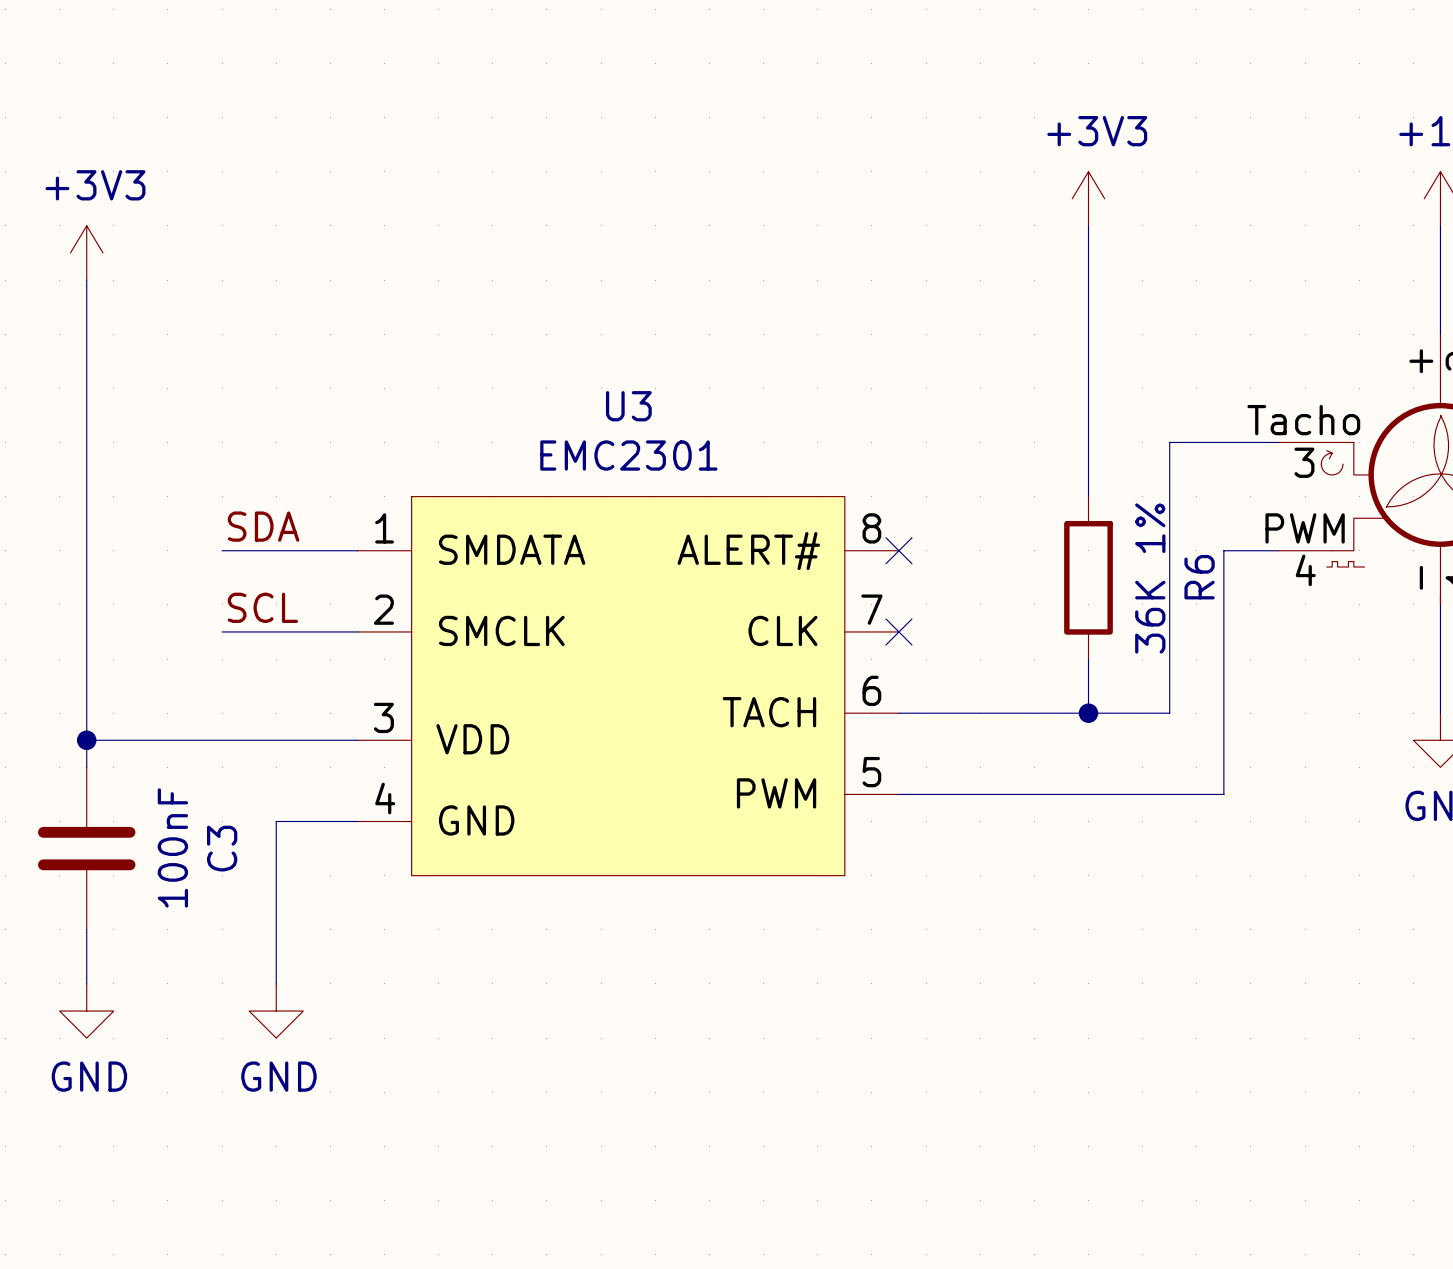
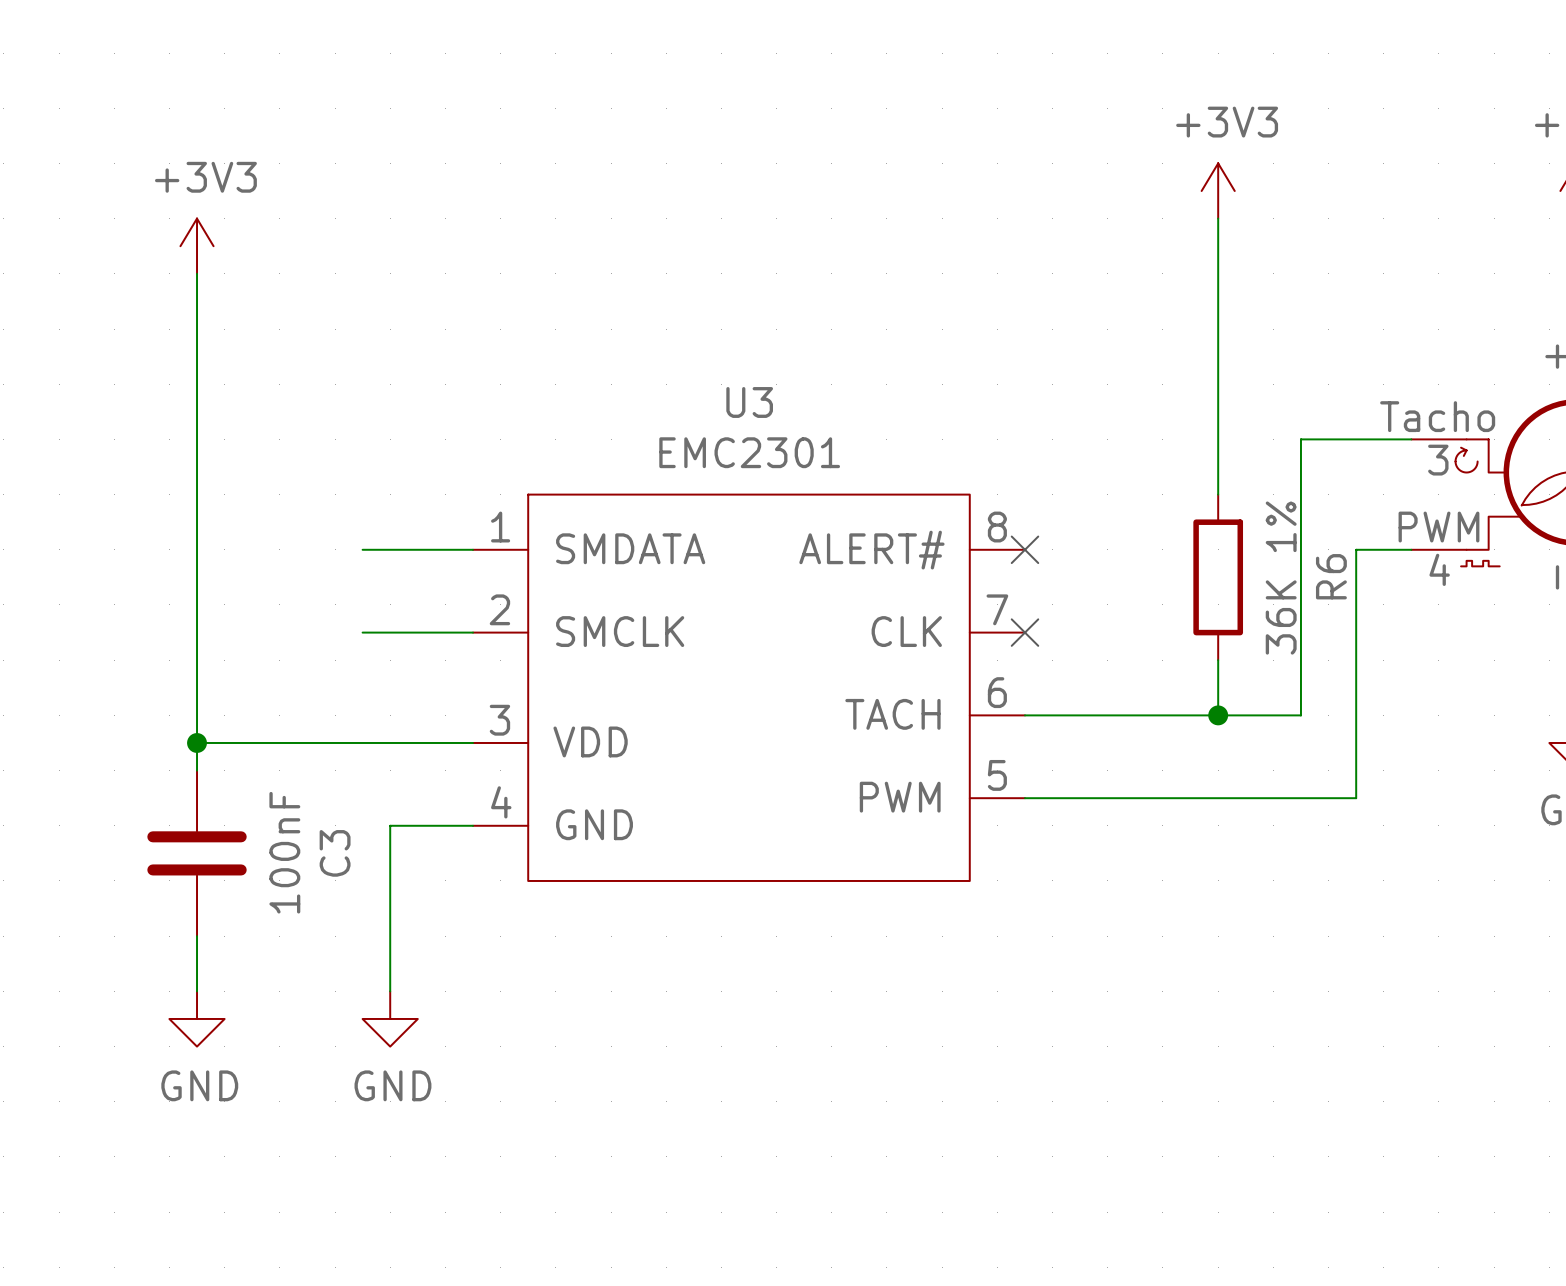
label: SDA (263, 526) -> none
wire: (222, 550) (249, 550) -> none
label: SCL (262, 607) -> none
wire: (222, 631) (249, 631) -> none

